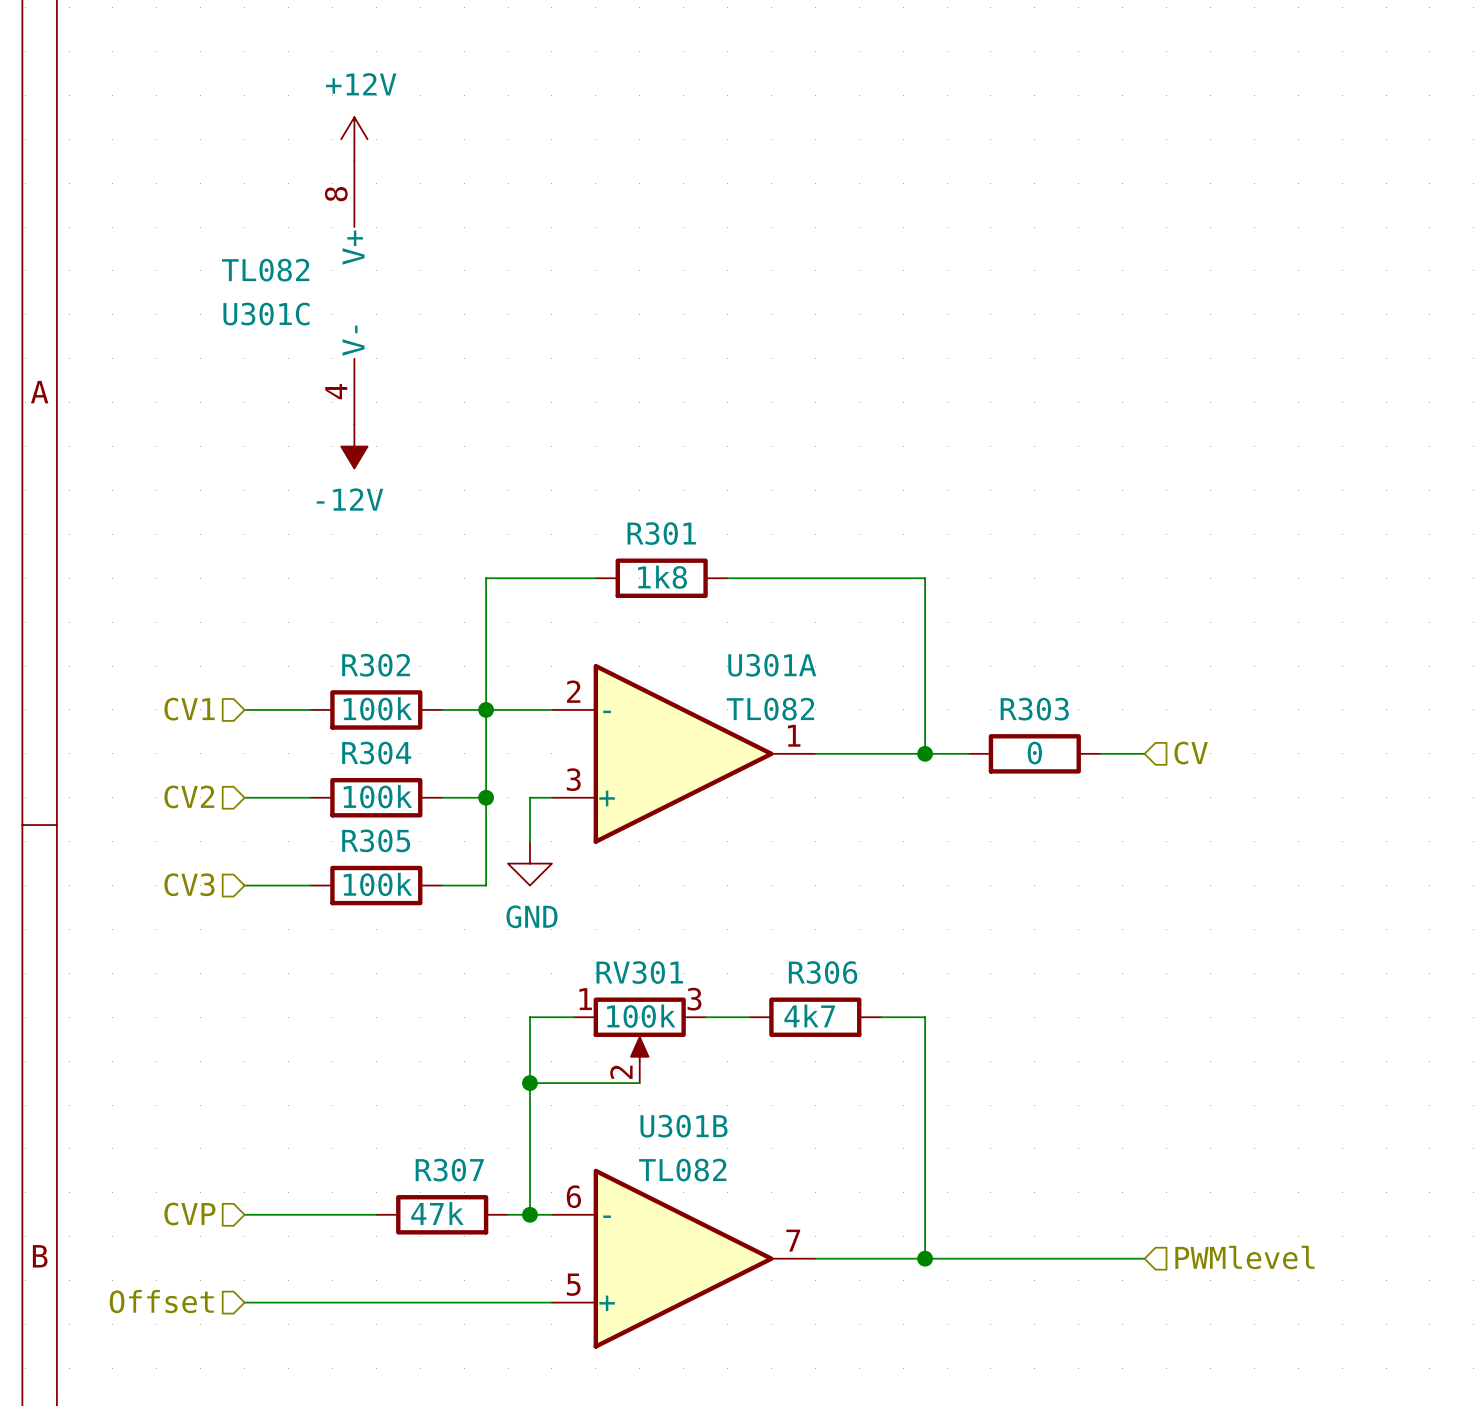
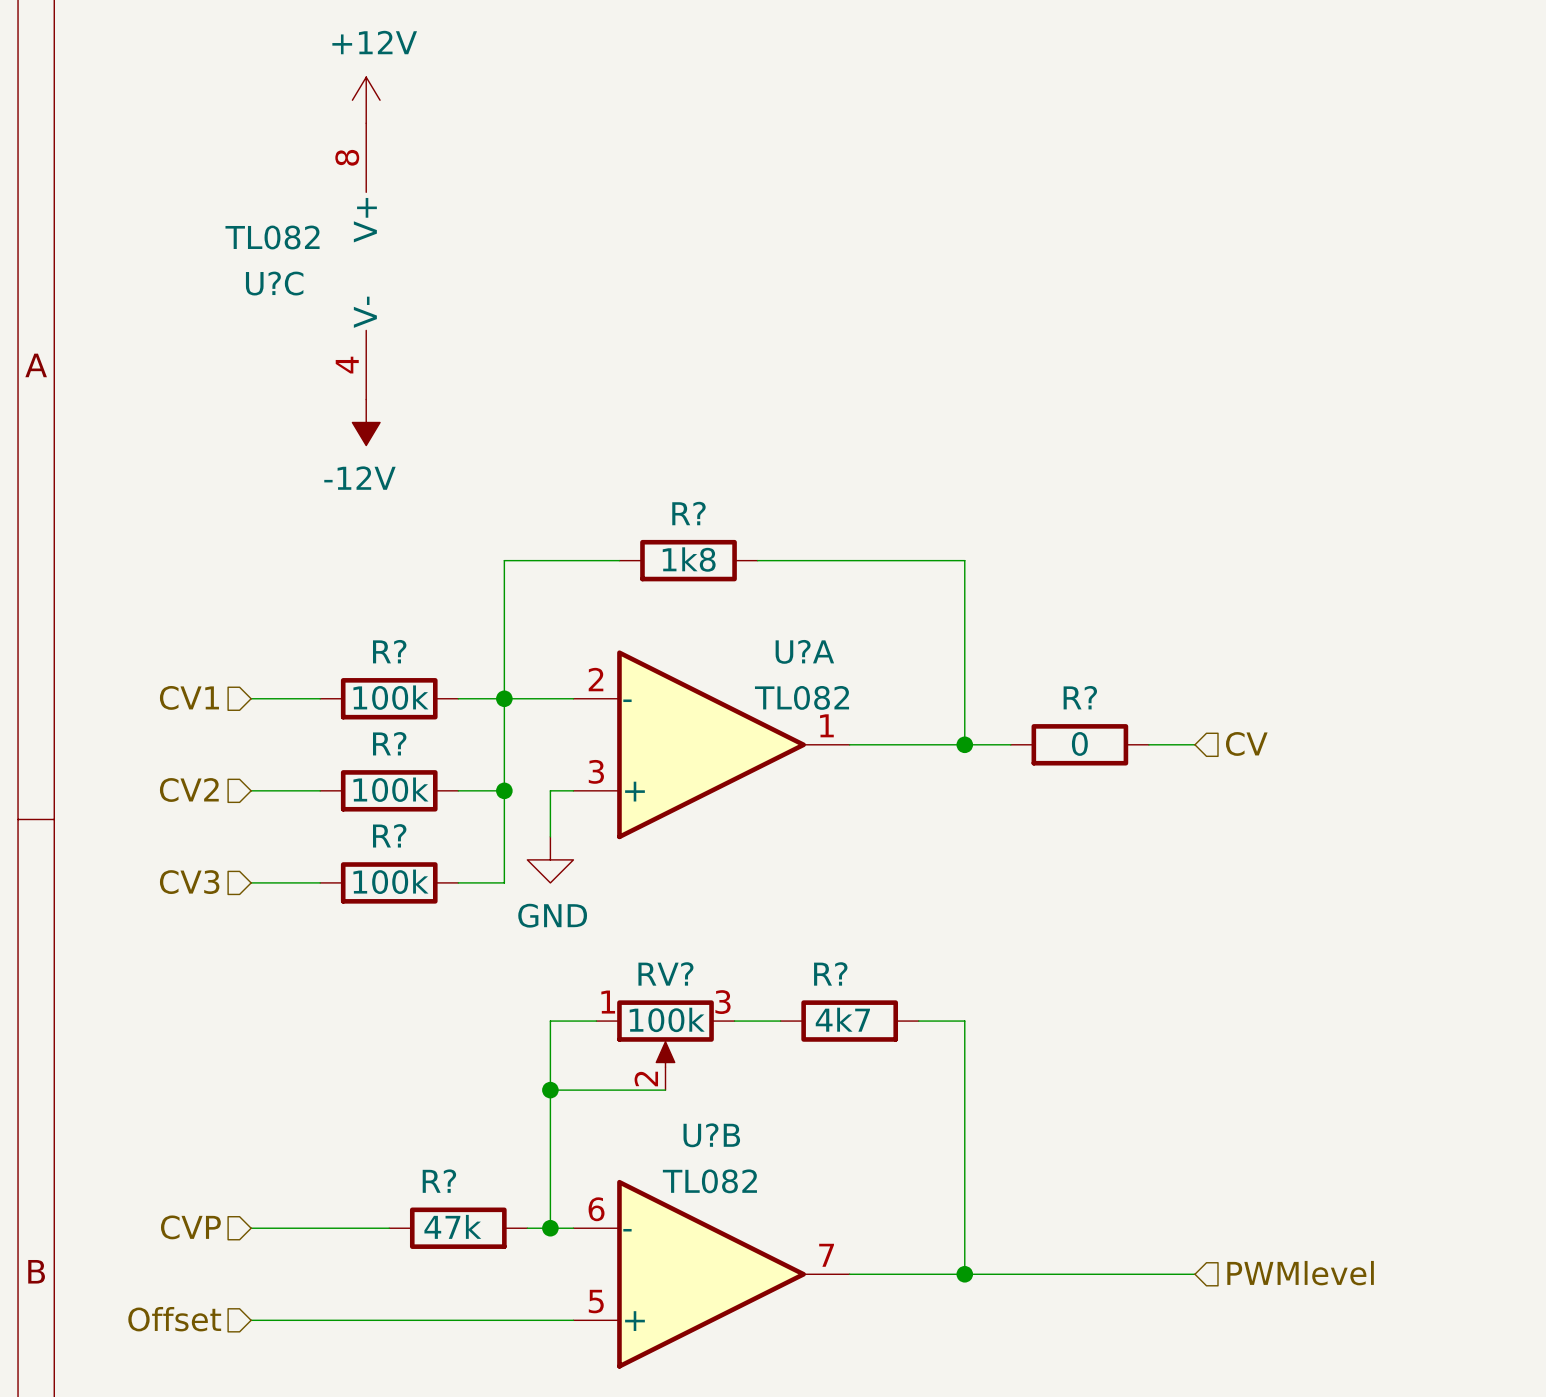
U301C name: U301C (266, 314) -> U?C (274, 283)
R301 name: R301 (661, 533) -> R? (688, 513)
R302 name: R302 (376, 665) -> R? (389, 651)
U301A name: U301A (772, 665) -> U?A (804, 651)
R303 name: R303 (1034, 709) -> R? (1080, 697)
R304 name: R304 (376, 753) -> R? (389, 743)
R305 name: R305 (376, 840) -> R? (389, 835)
RV301 name: RV301 (639, 972) -> RV? (665, 973)
R306 name: R306 (823, 972) -> R? (830, 973)
U301B name: U301B (684, 1126) -> U?B (711, 1135)
R307 name: R307 (449, 1170) -> R? (439, 1181)

